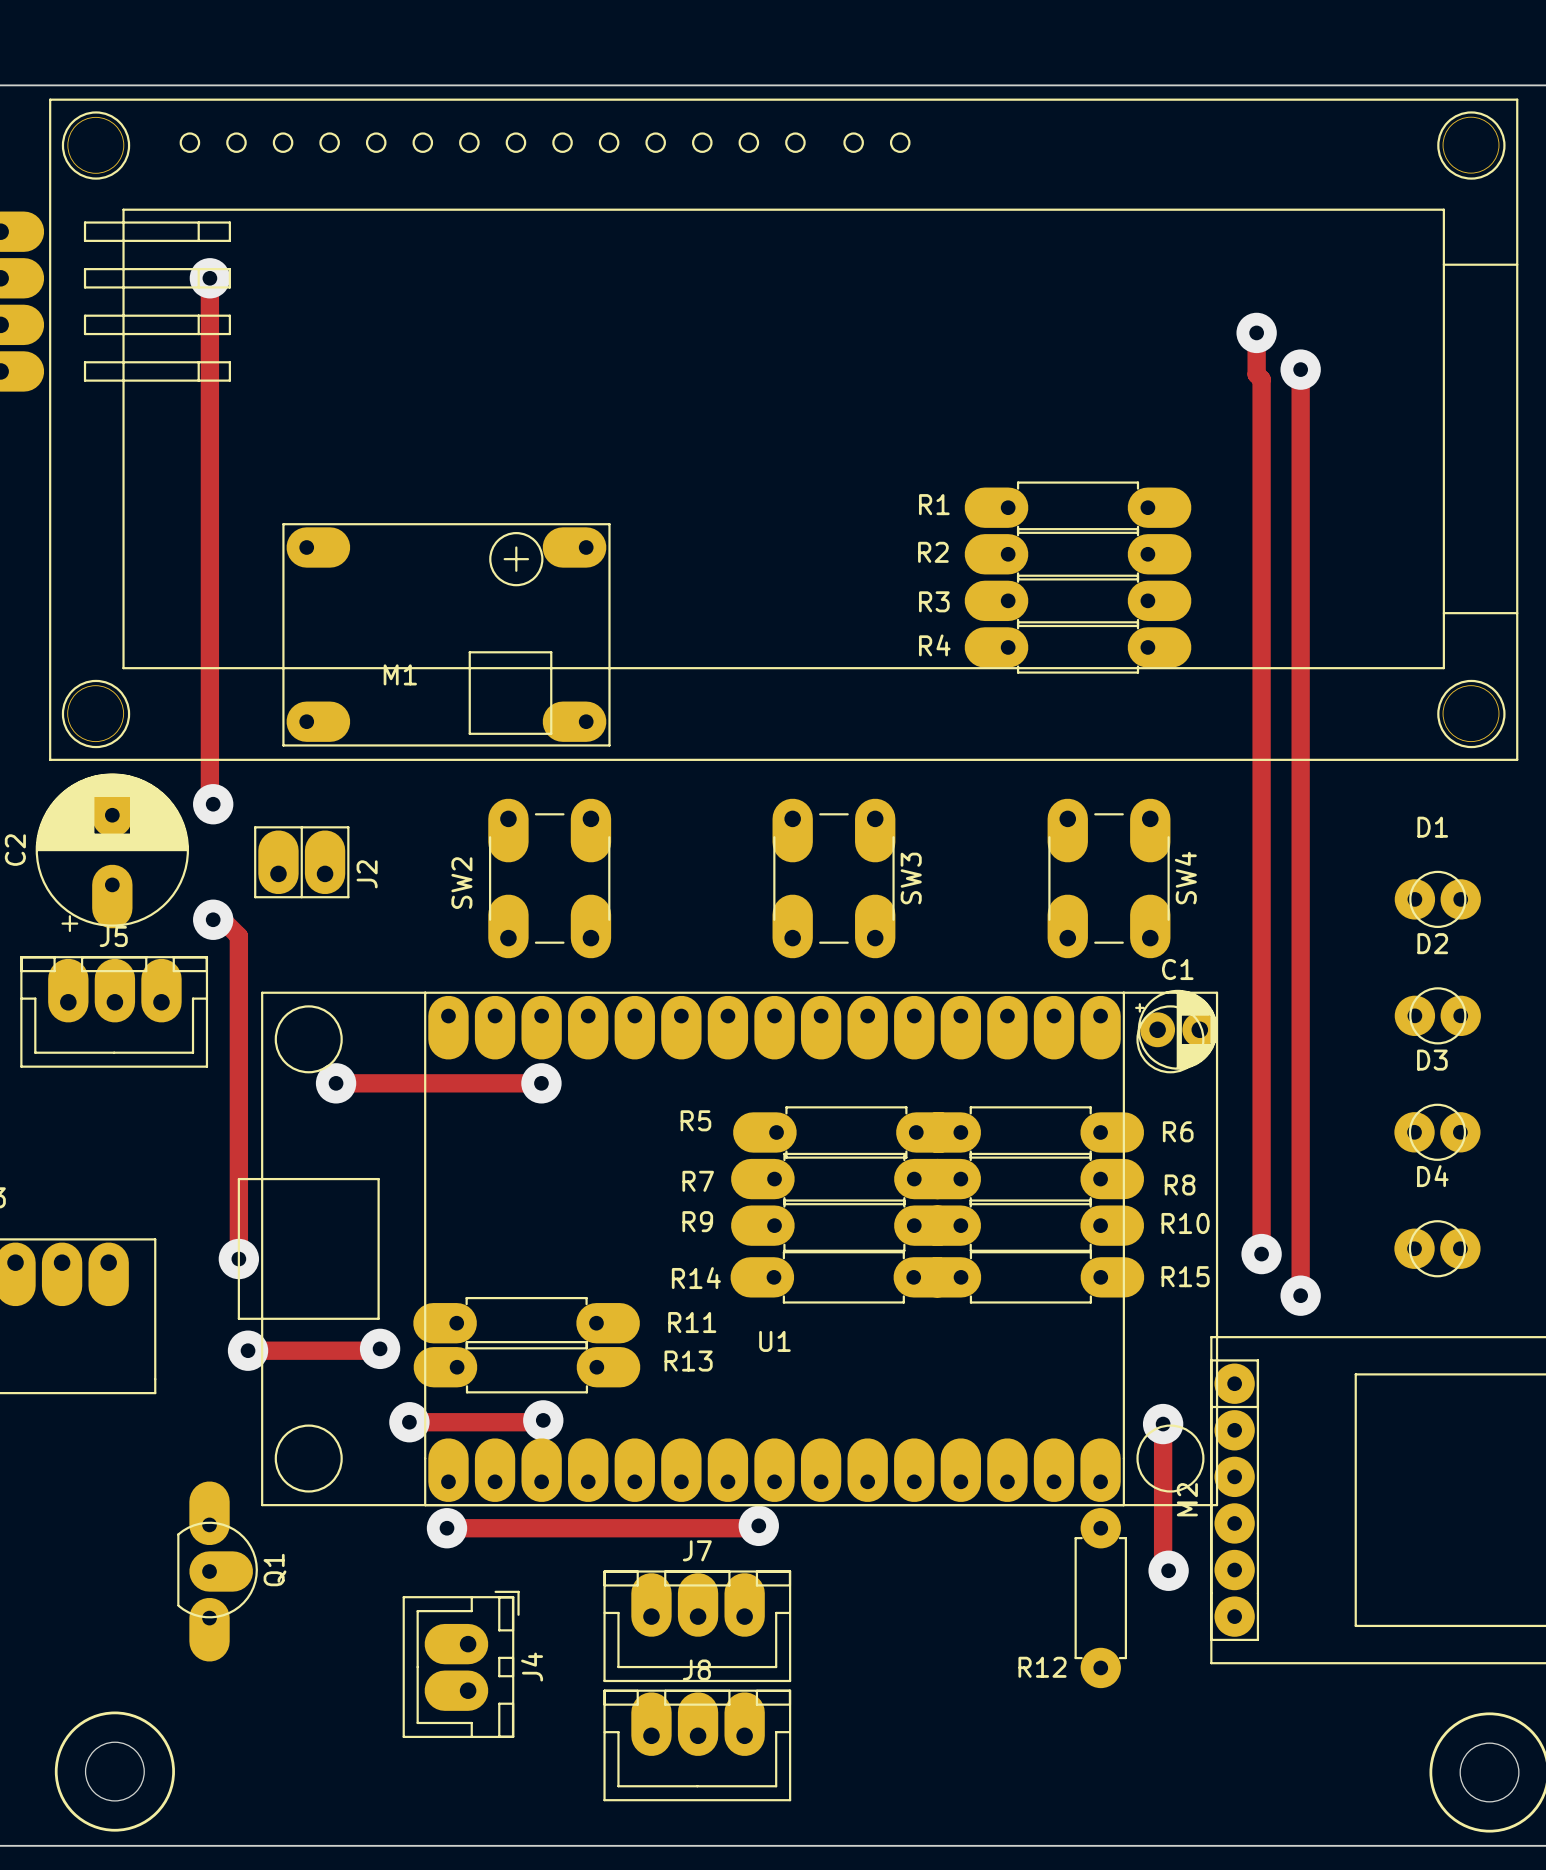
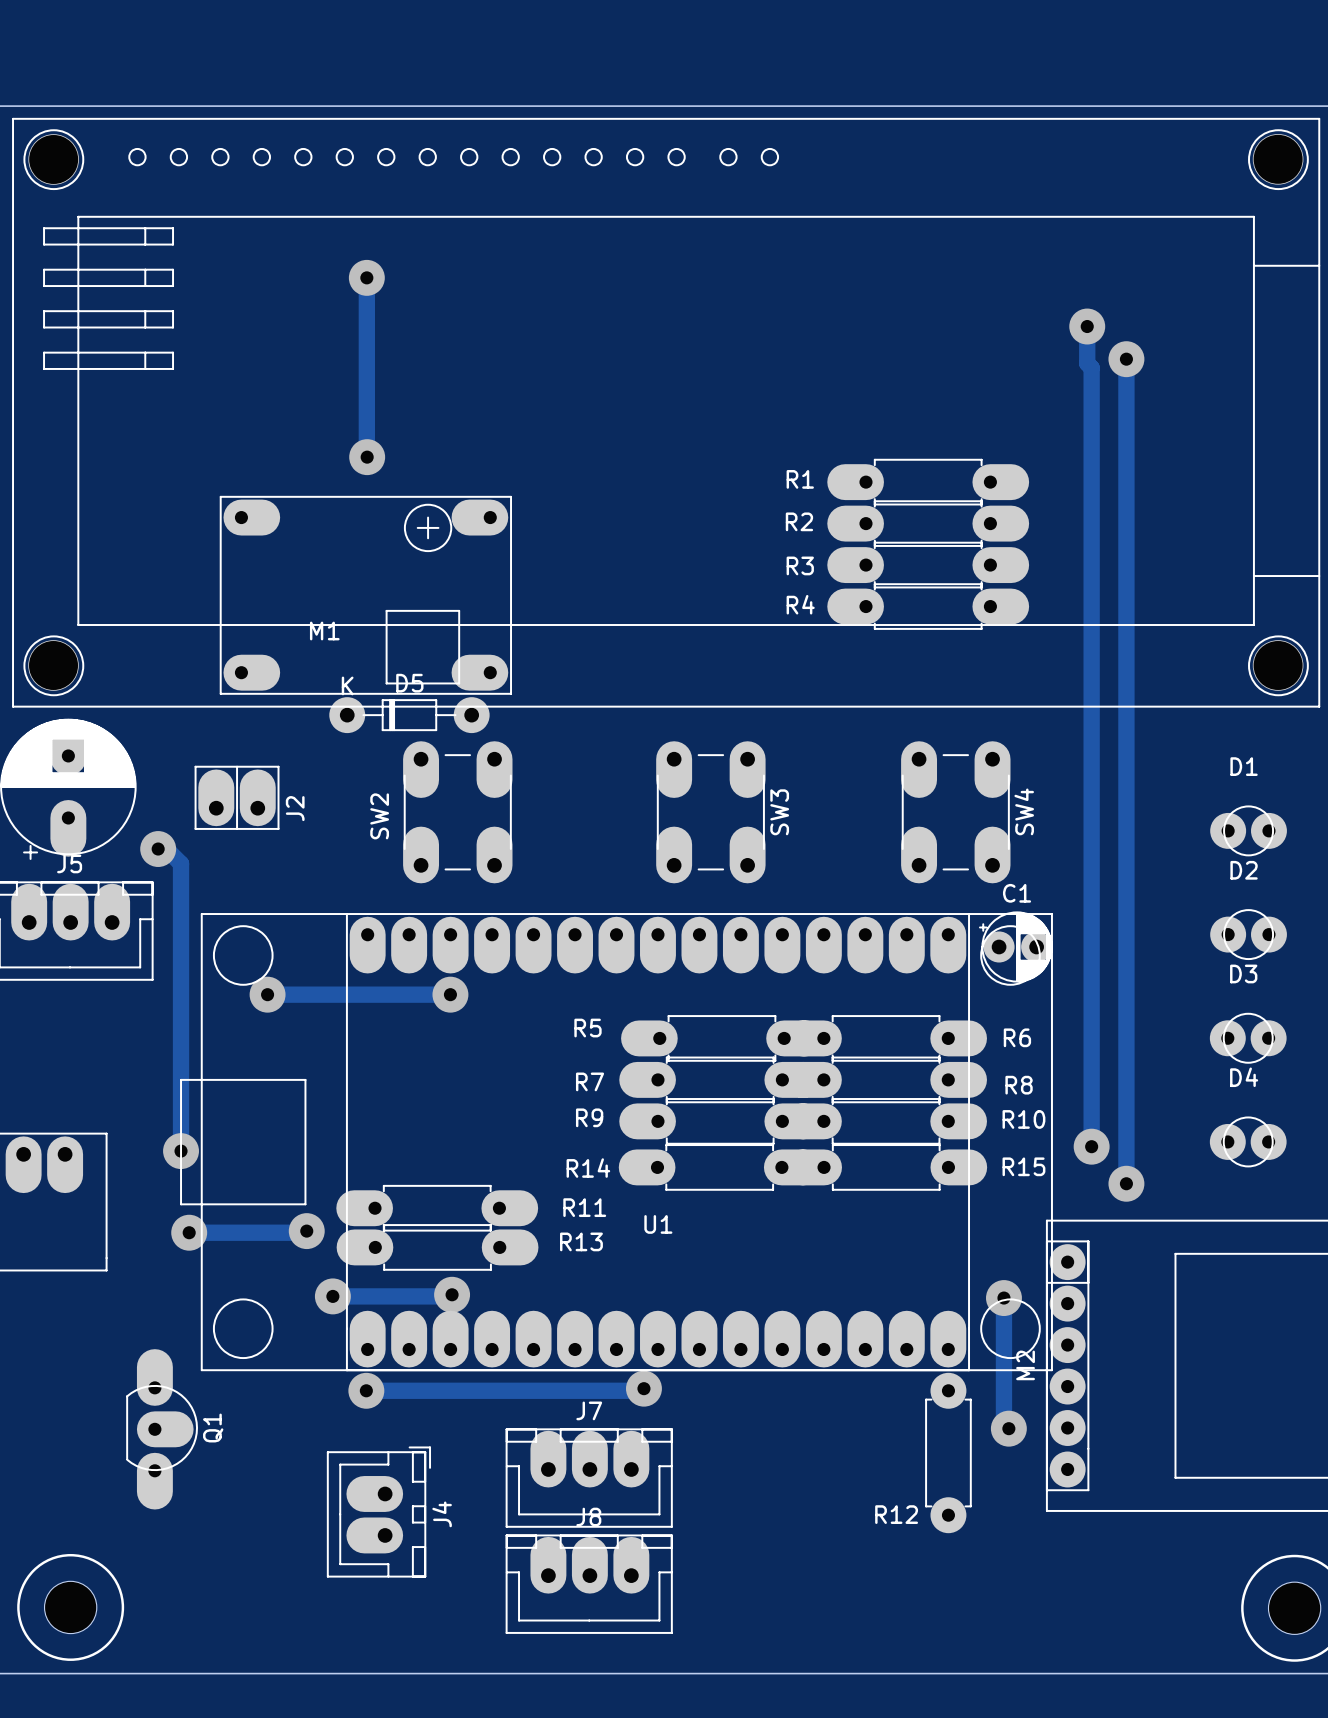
track: (209, 278) (209, 800) (213, 804) -> none
via: (209, 278) -> none
track: none -> (366, 277) (367, 457)
via: none -> (366, 277)
via: none -> (367, 457)
D5: none -> (409, 715)
via: (213, 804) -> none

